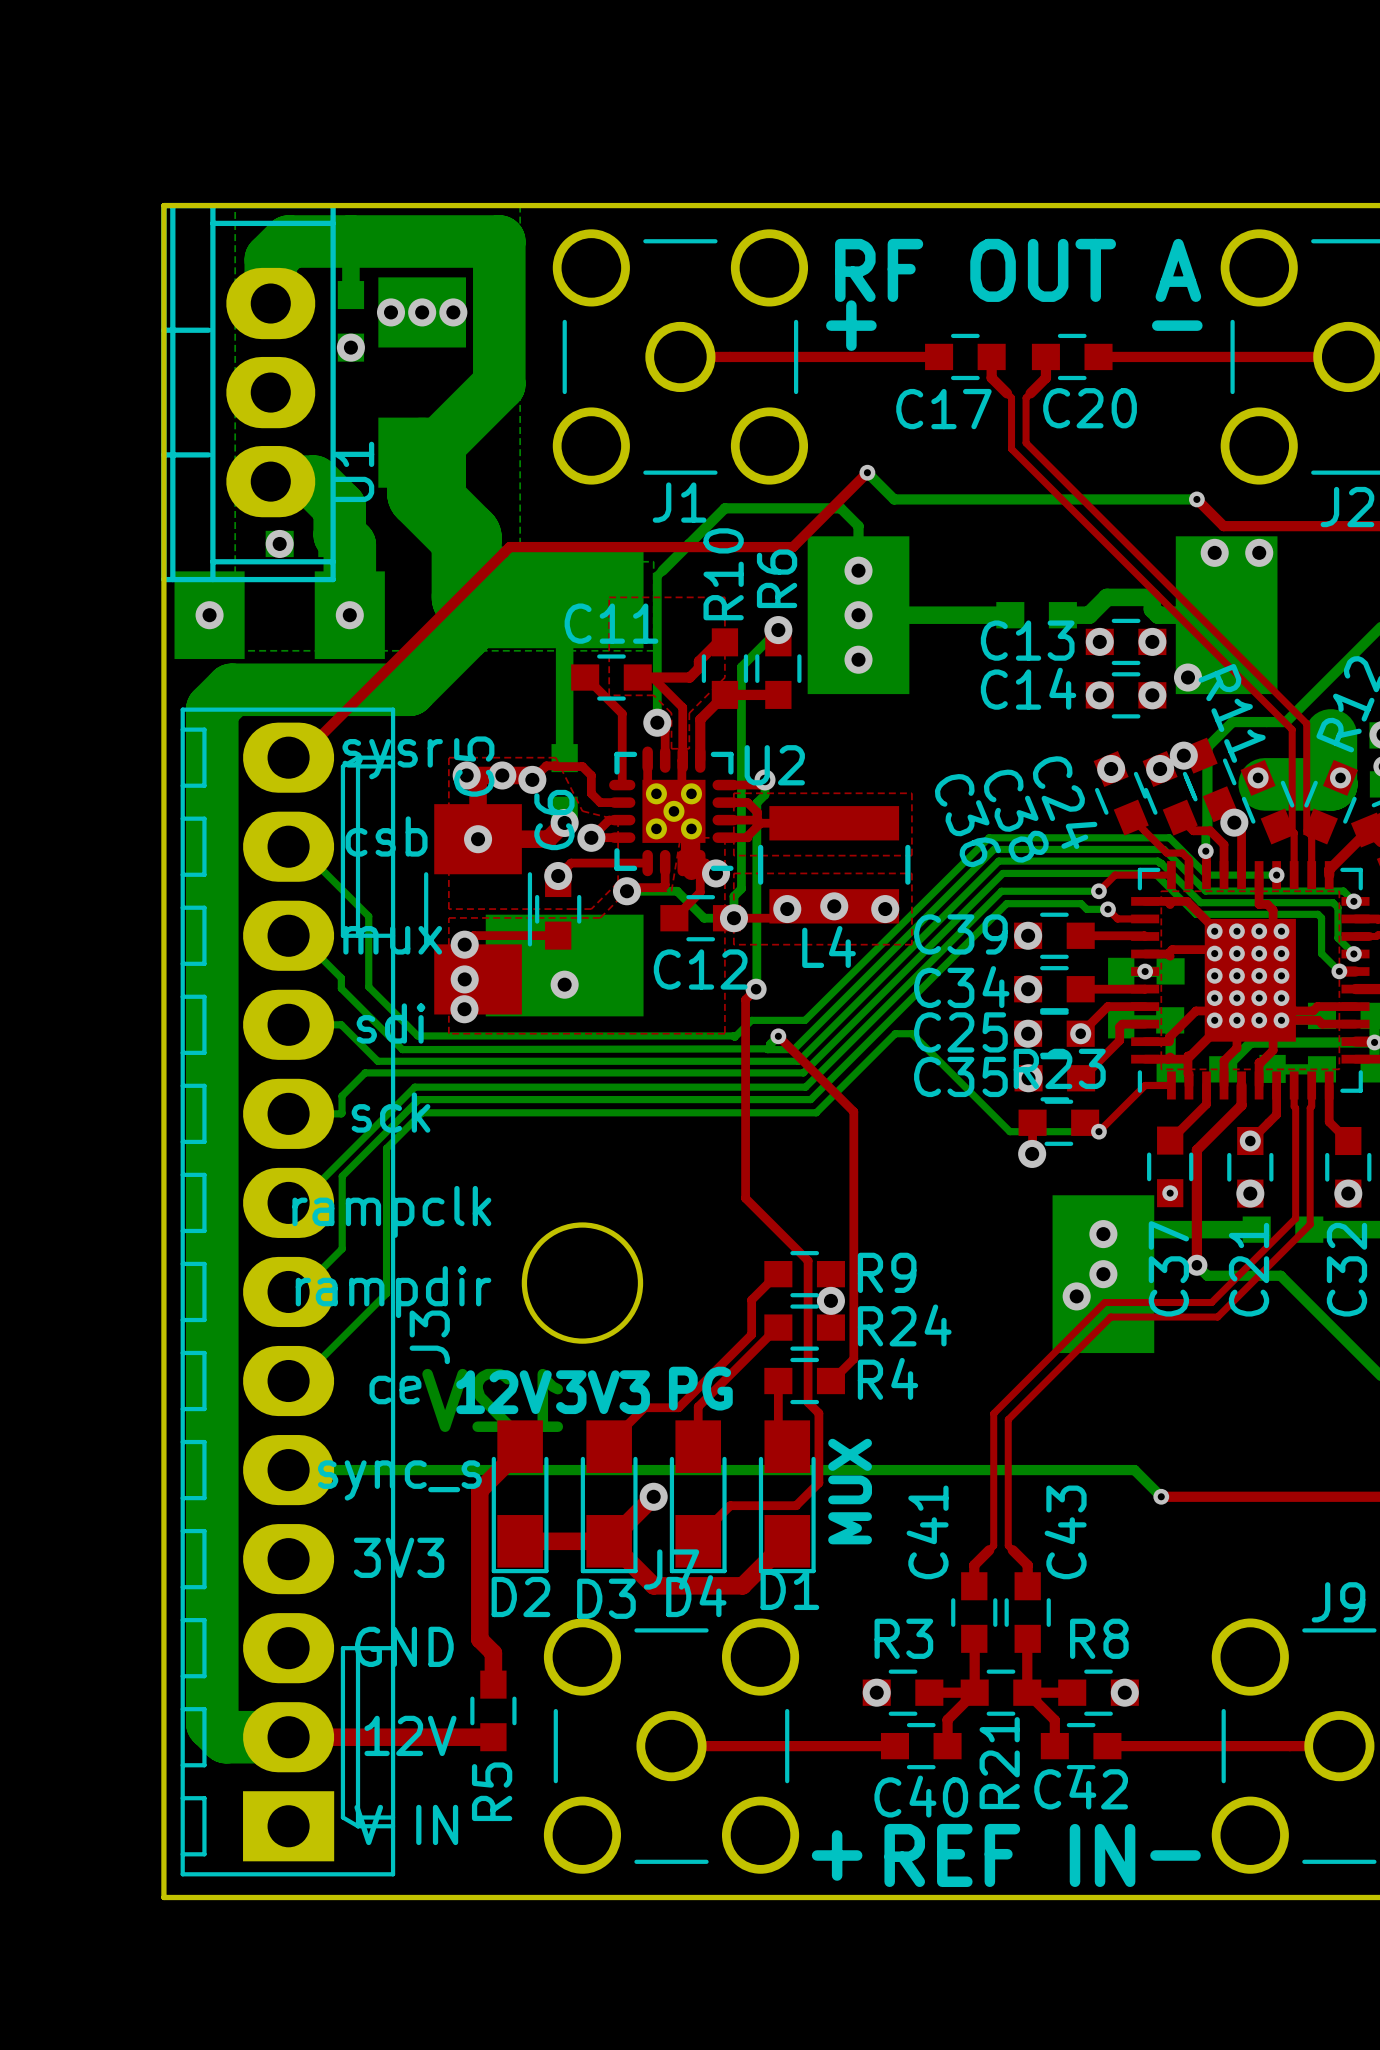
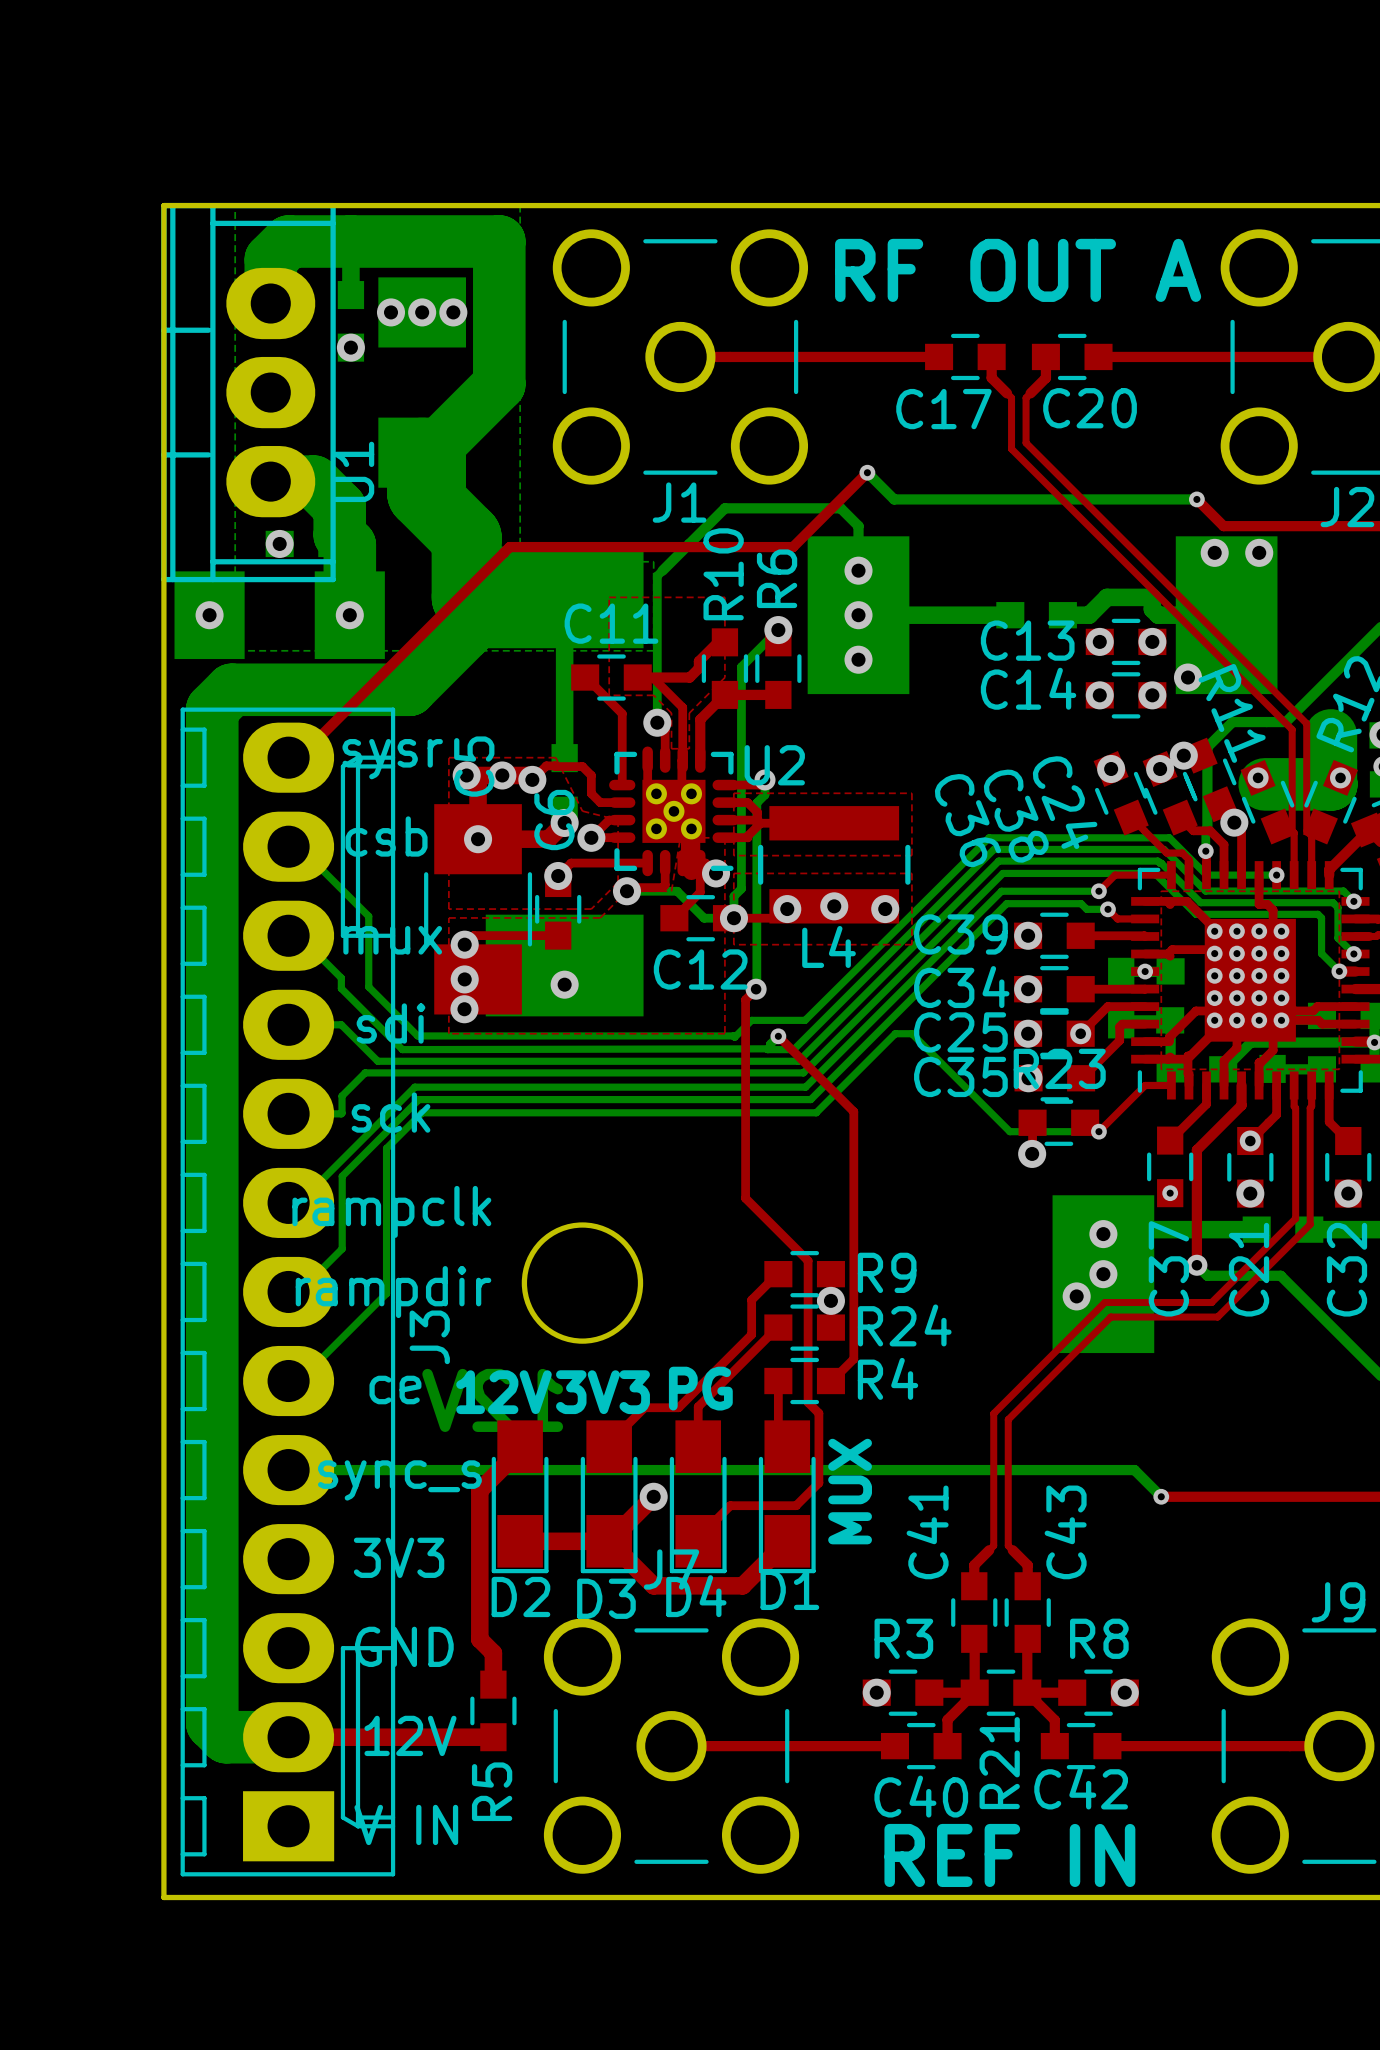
text: + (851, 325) -> none
text: - (1177, 325) -> none
text: + (837, 1855) -> none
text: - (1175, 1855) -> none

